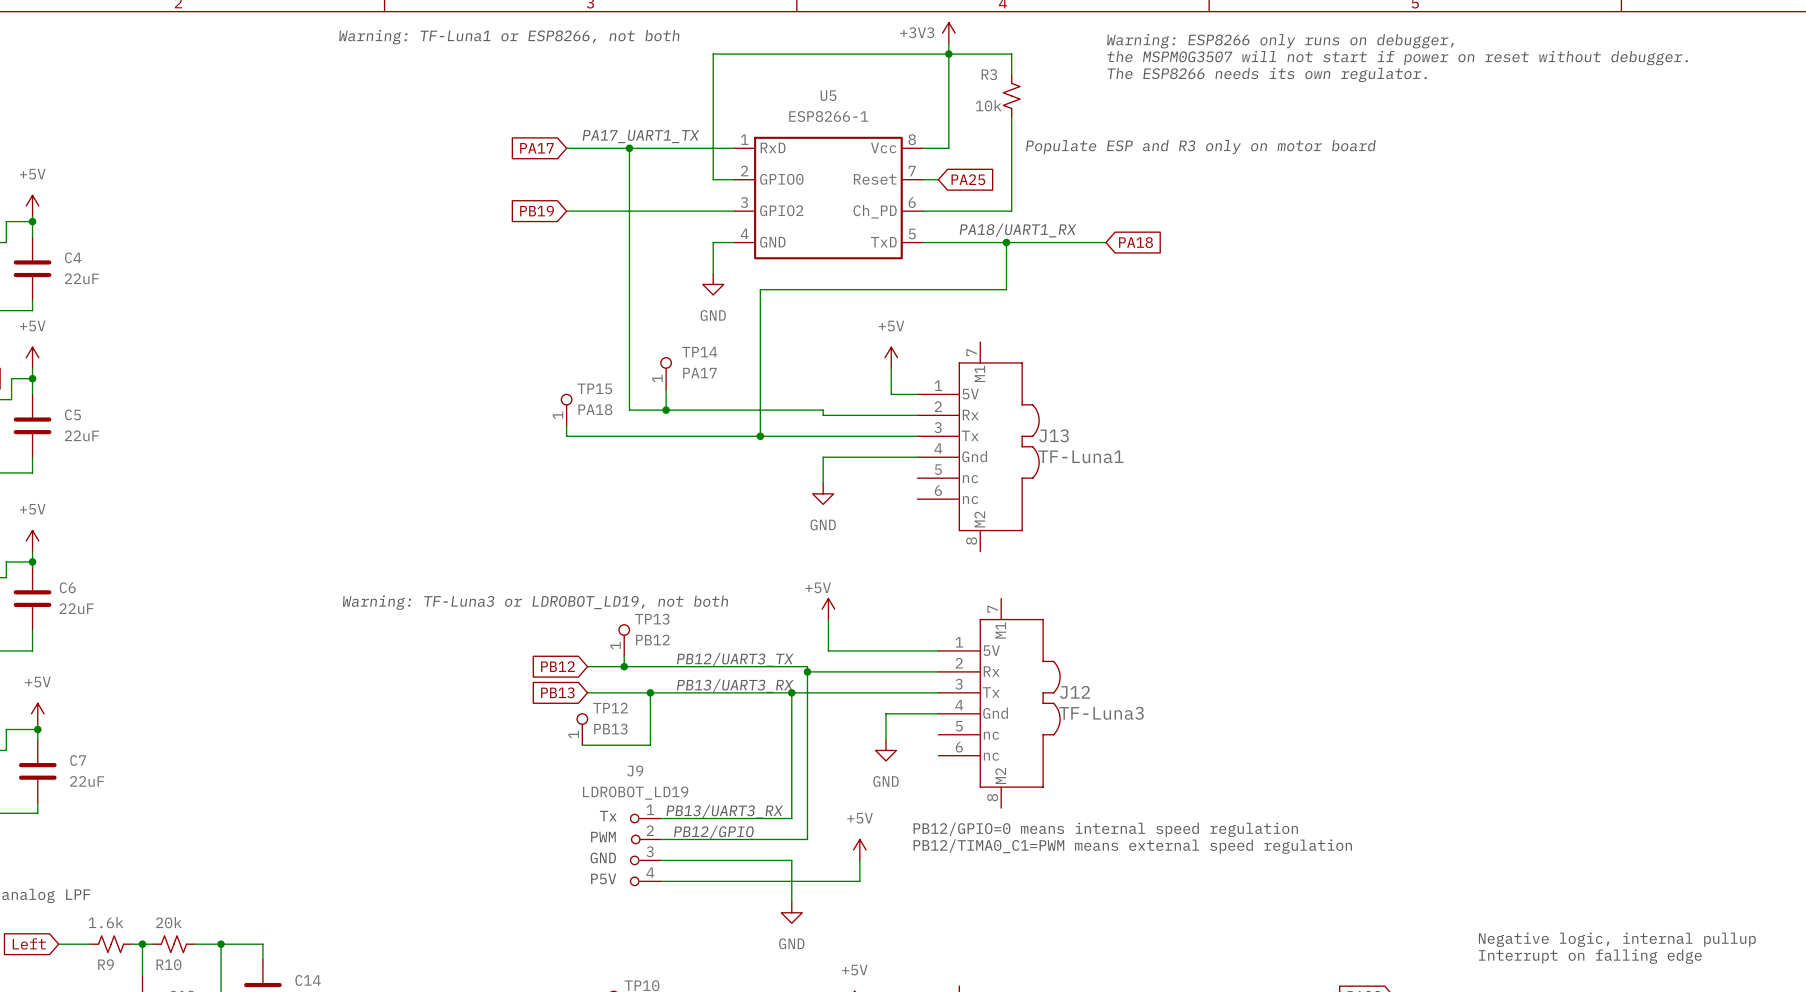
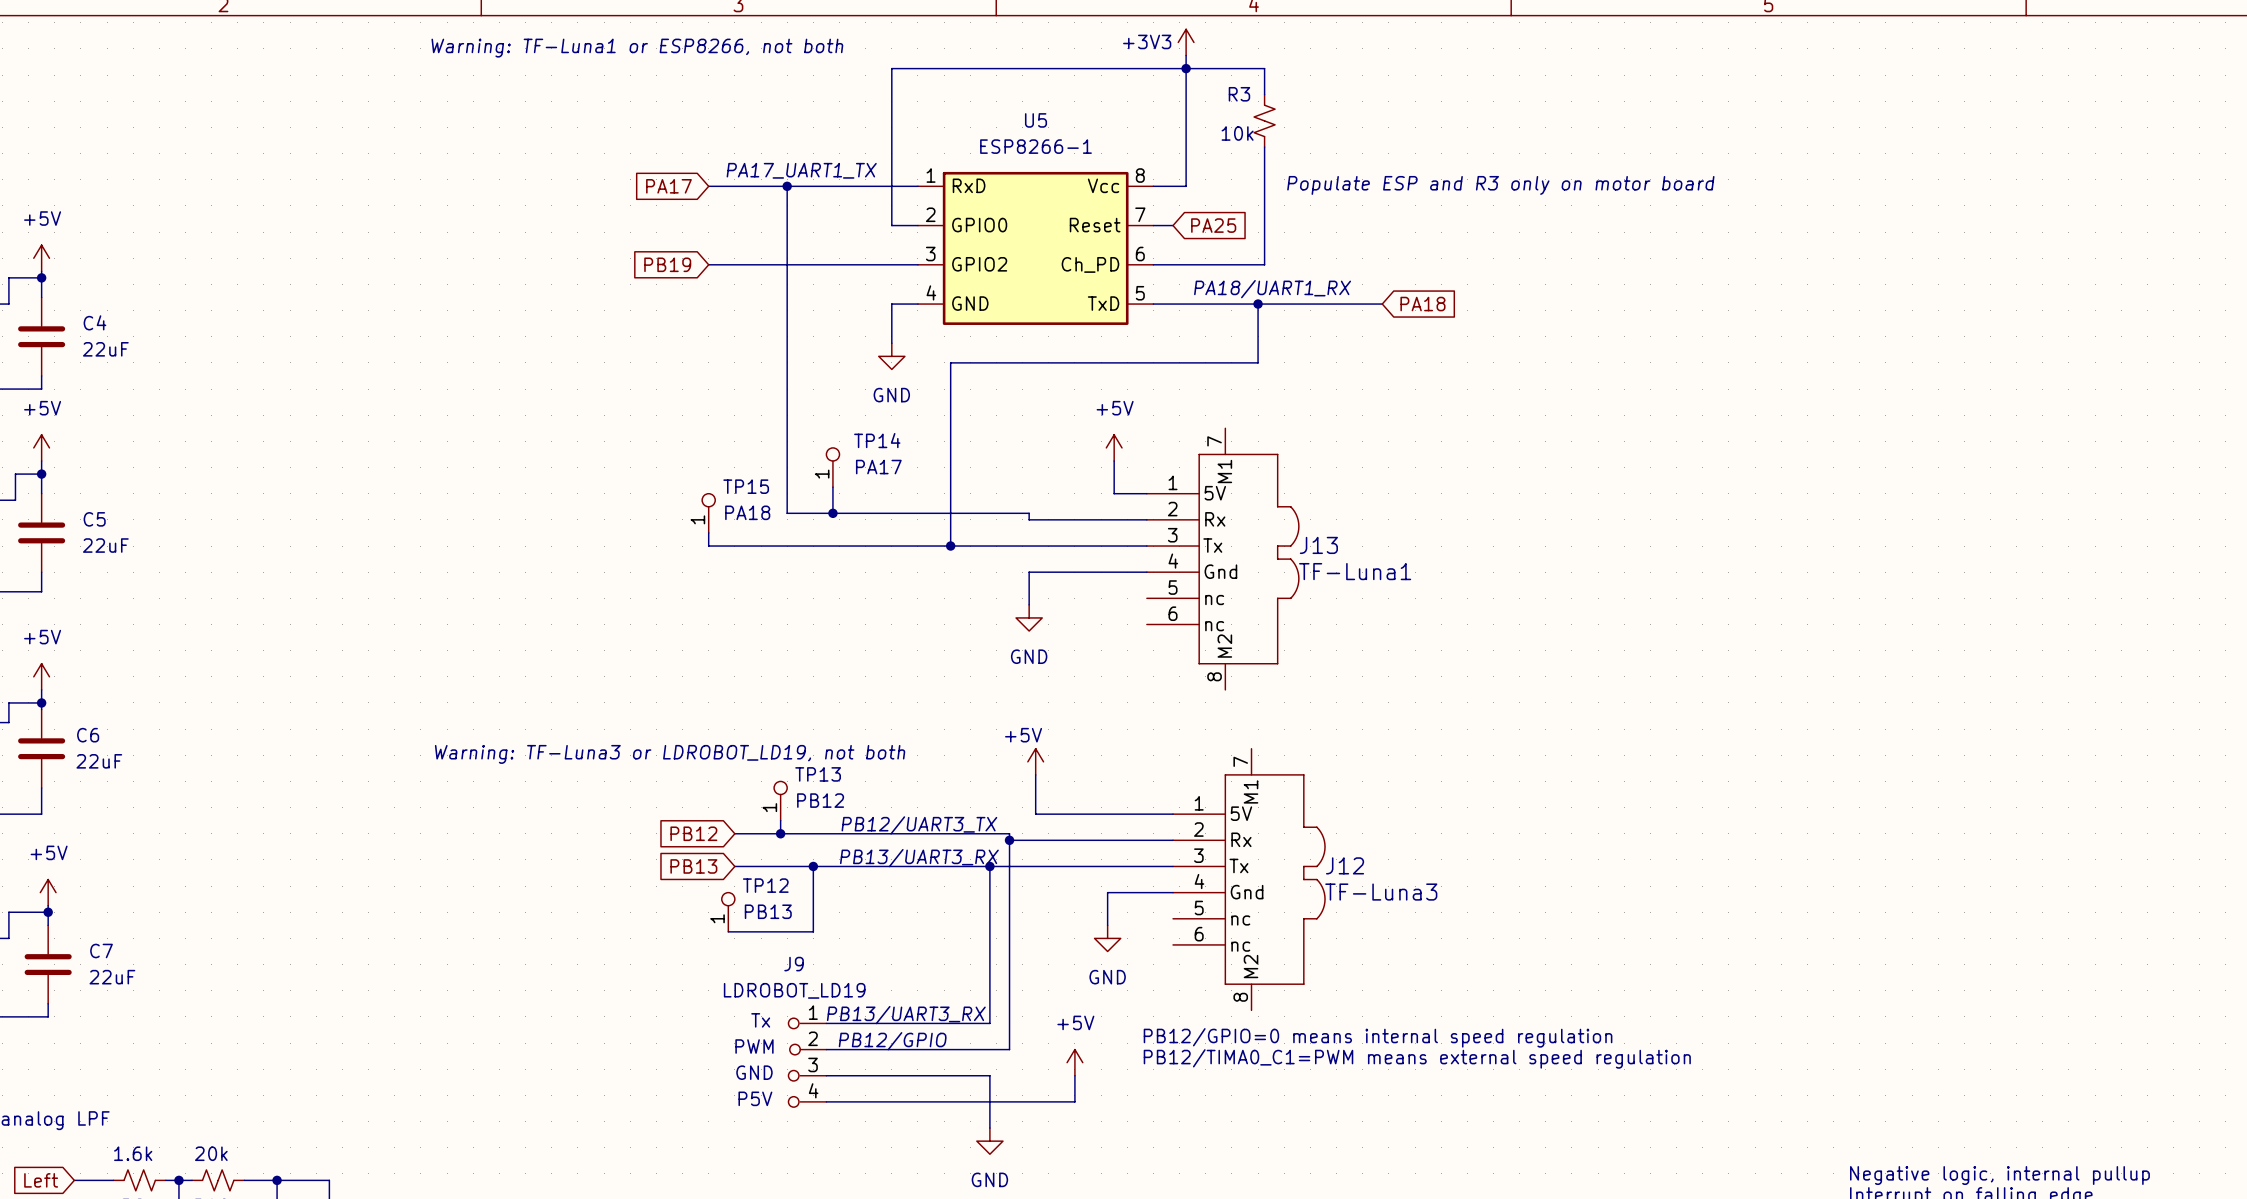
text: Warning: ESP8266 only runs on debugger, (1280, 41) -> none
text: the MSPM0G3507 will not start if power on reset without debugger. (1397, 58) -> none
text: The ESP8266 needs its own regulator. (1267, 74) -> none

